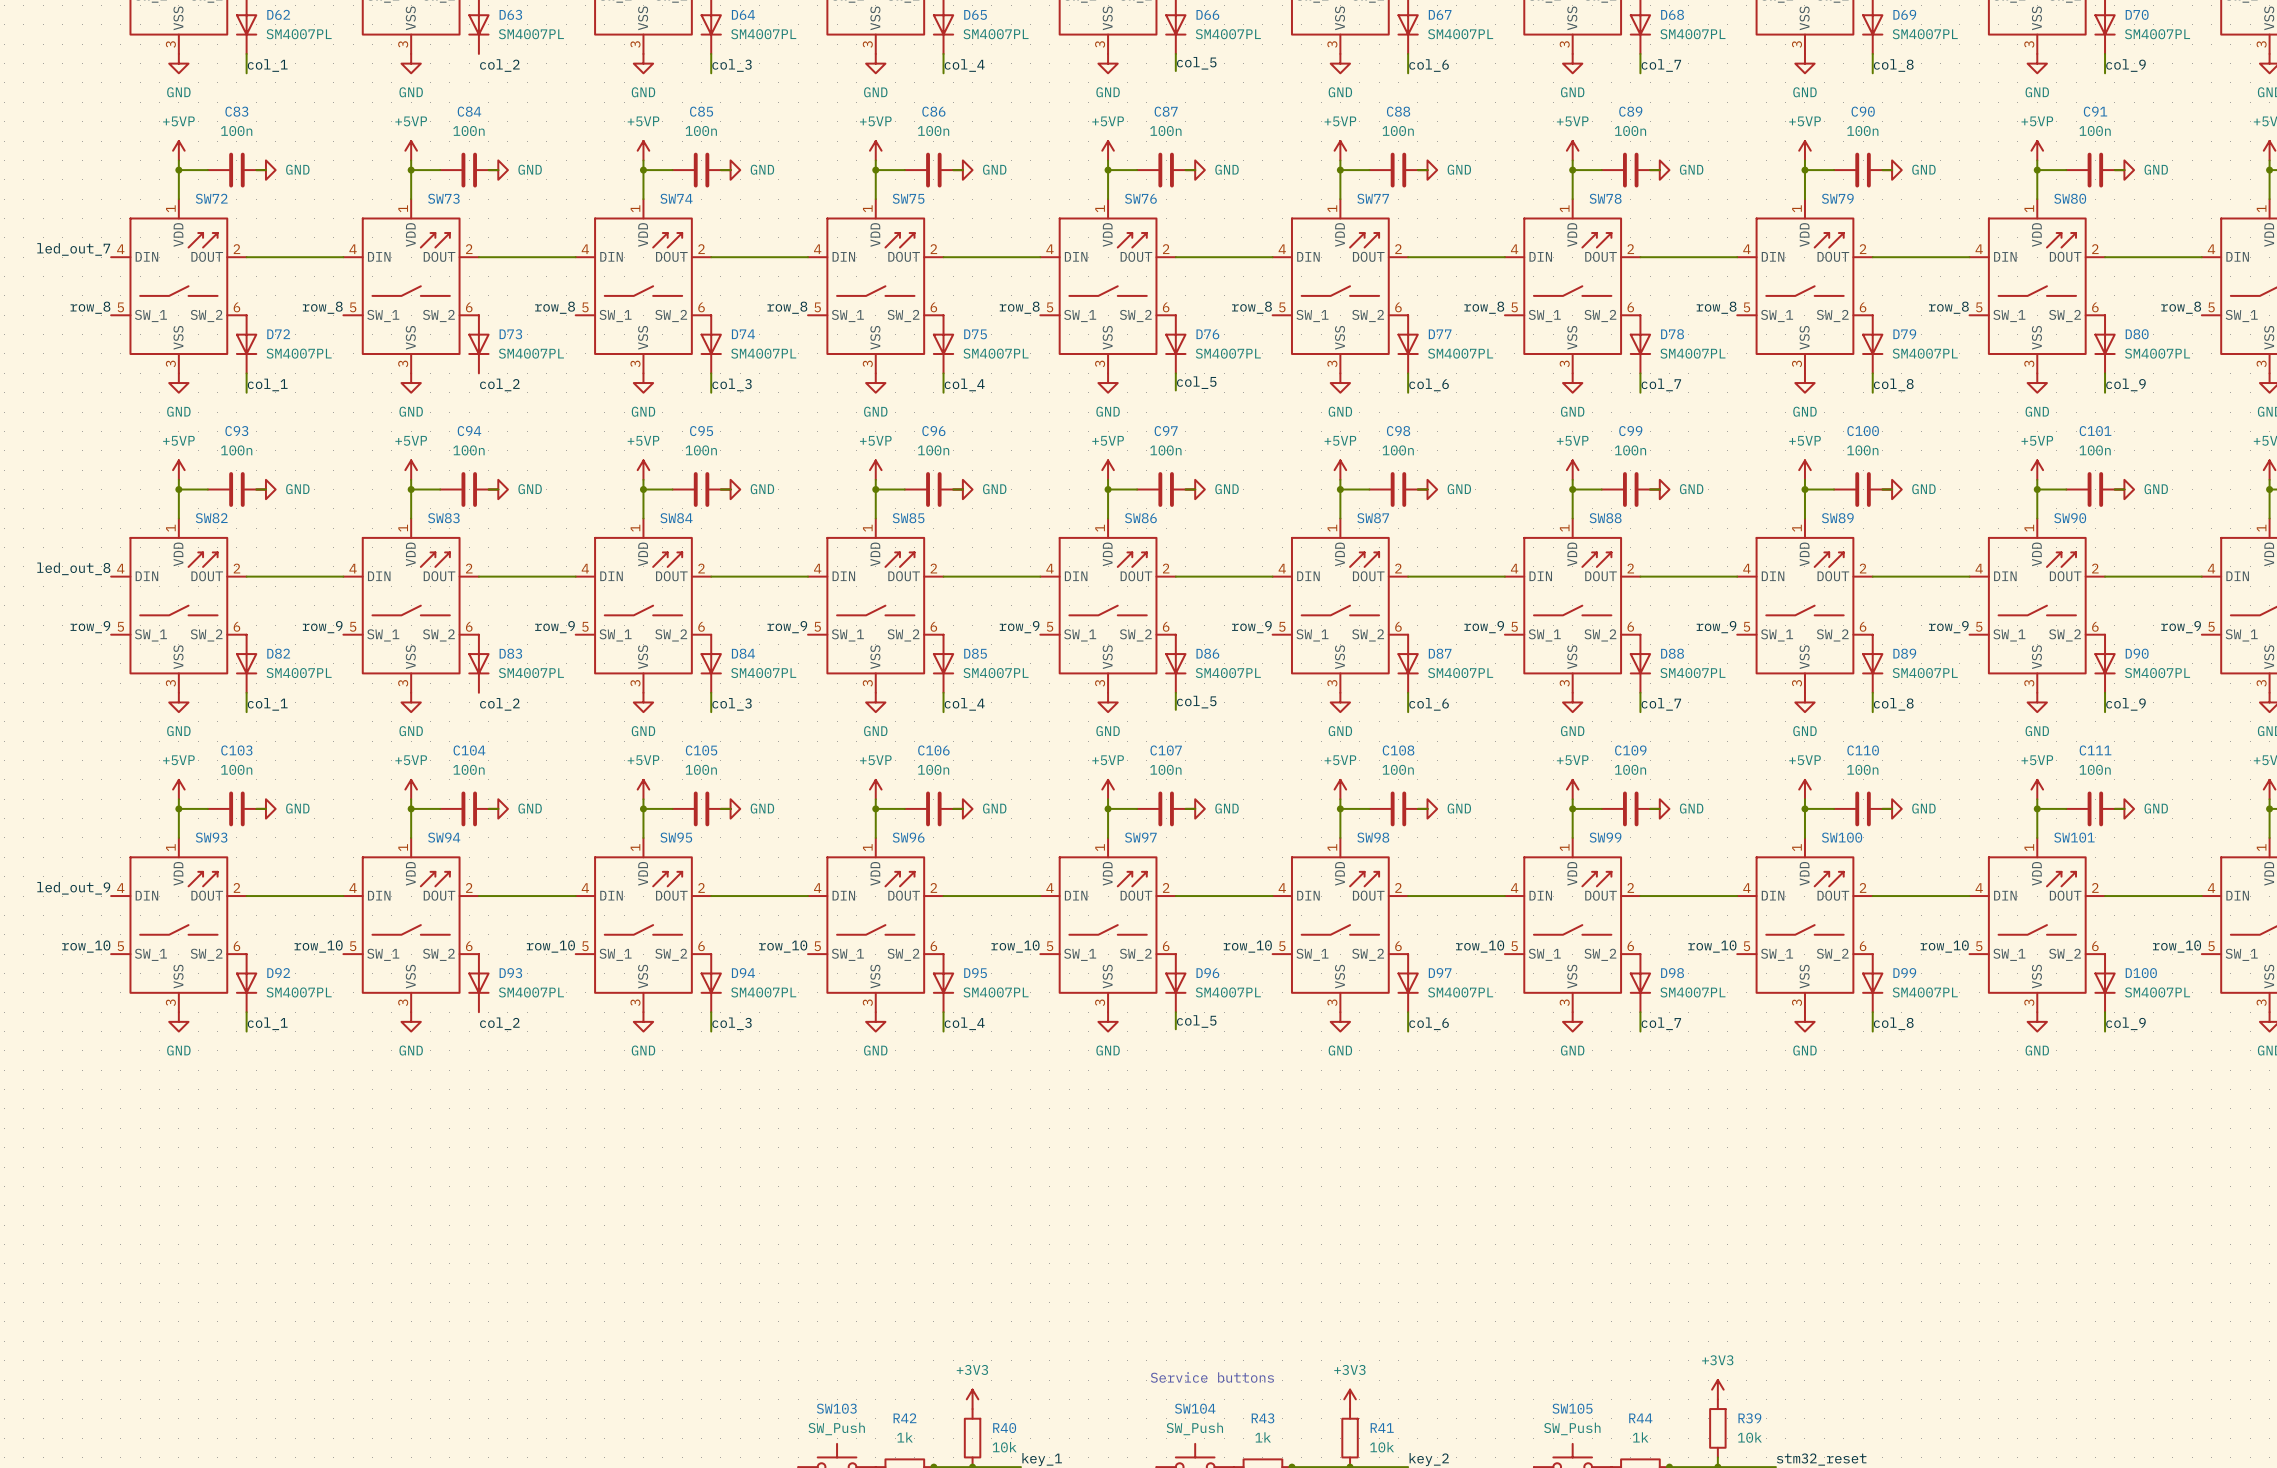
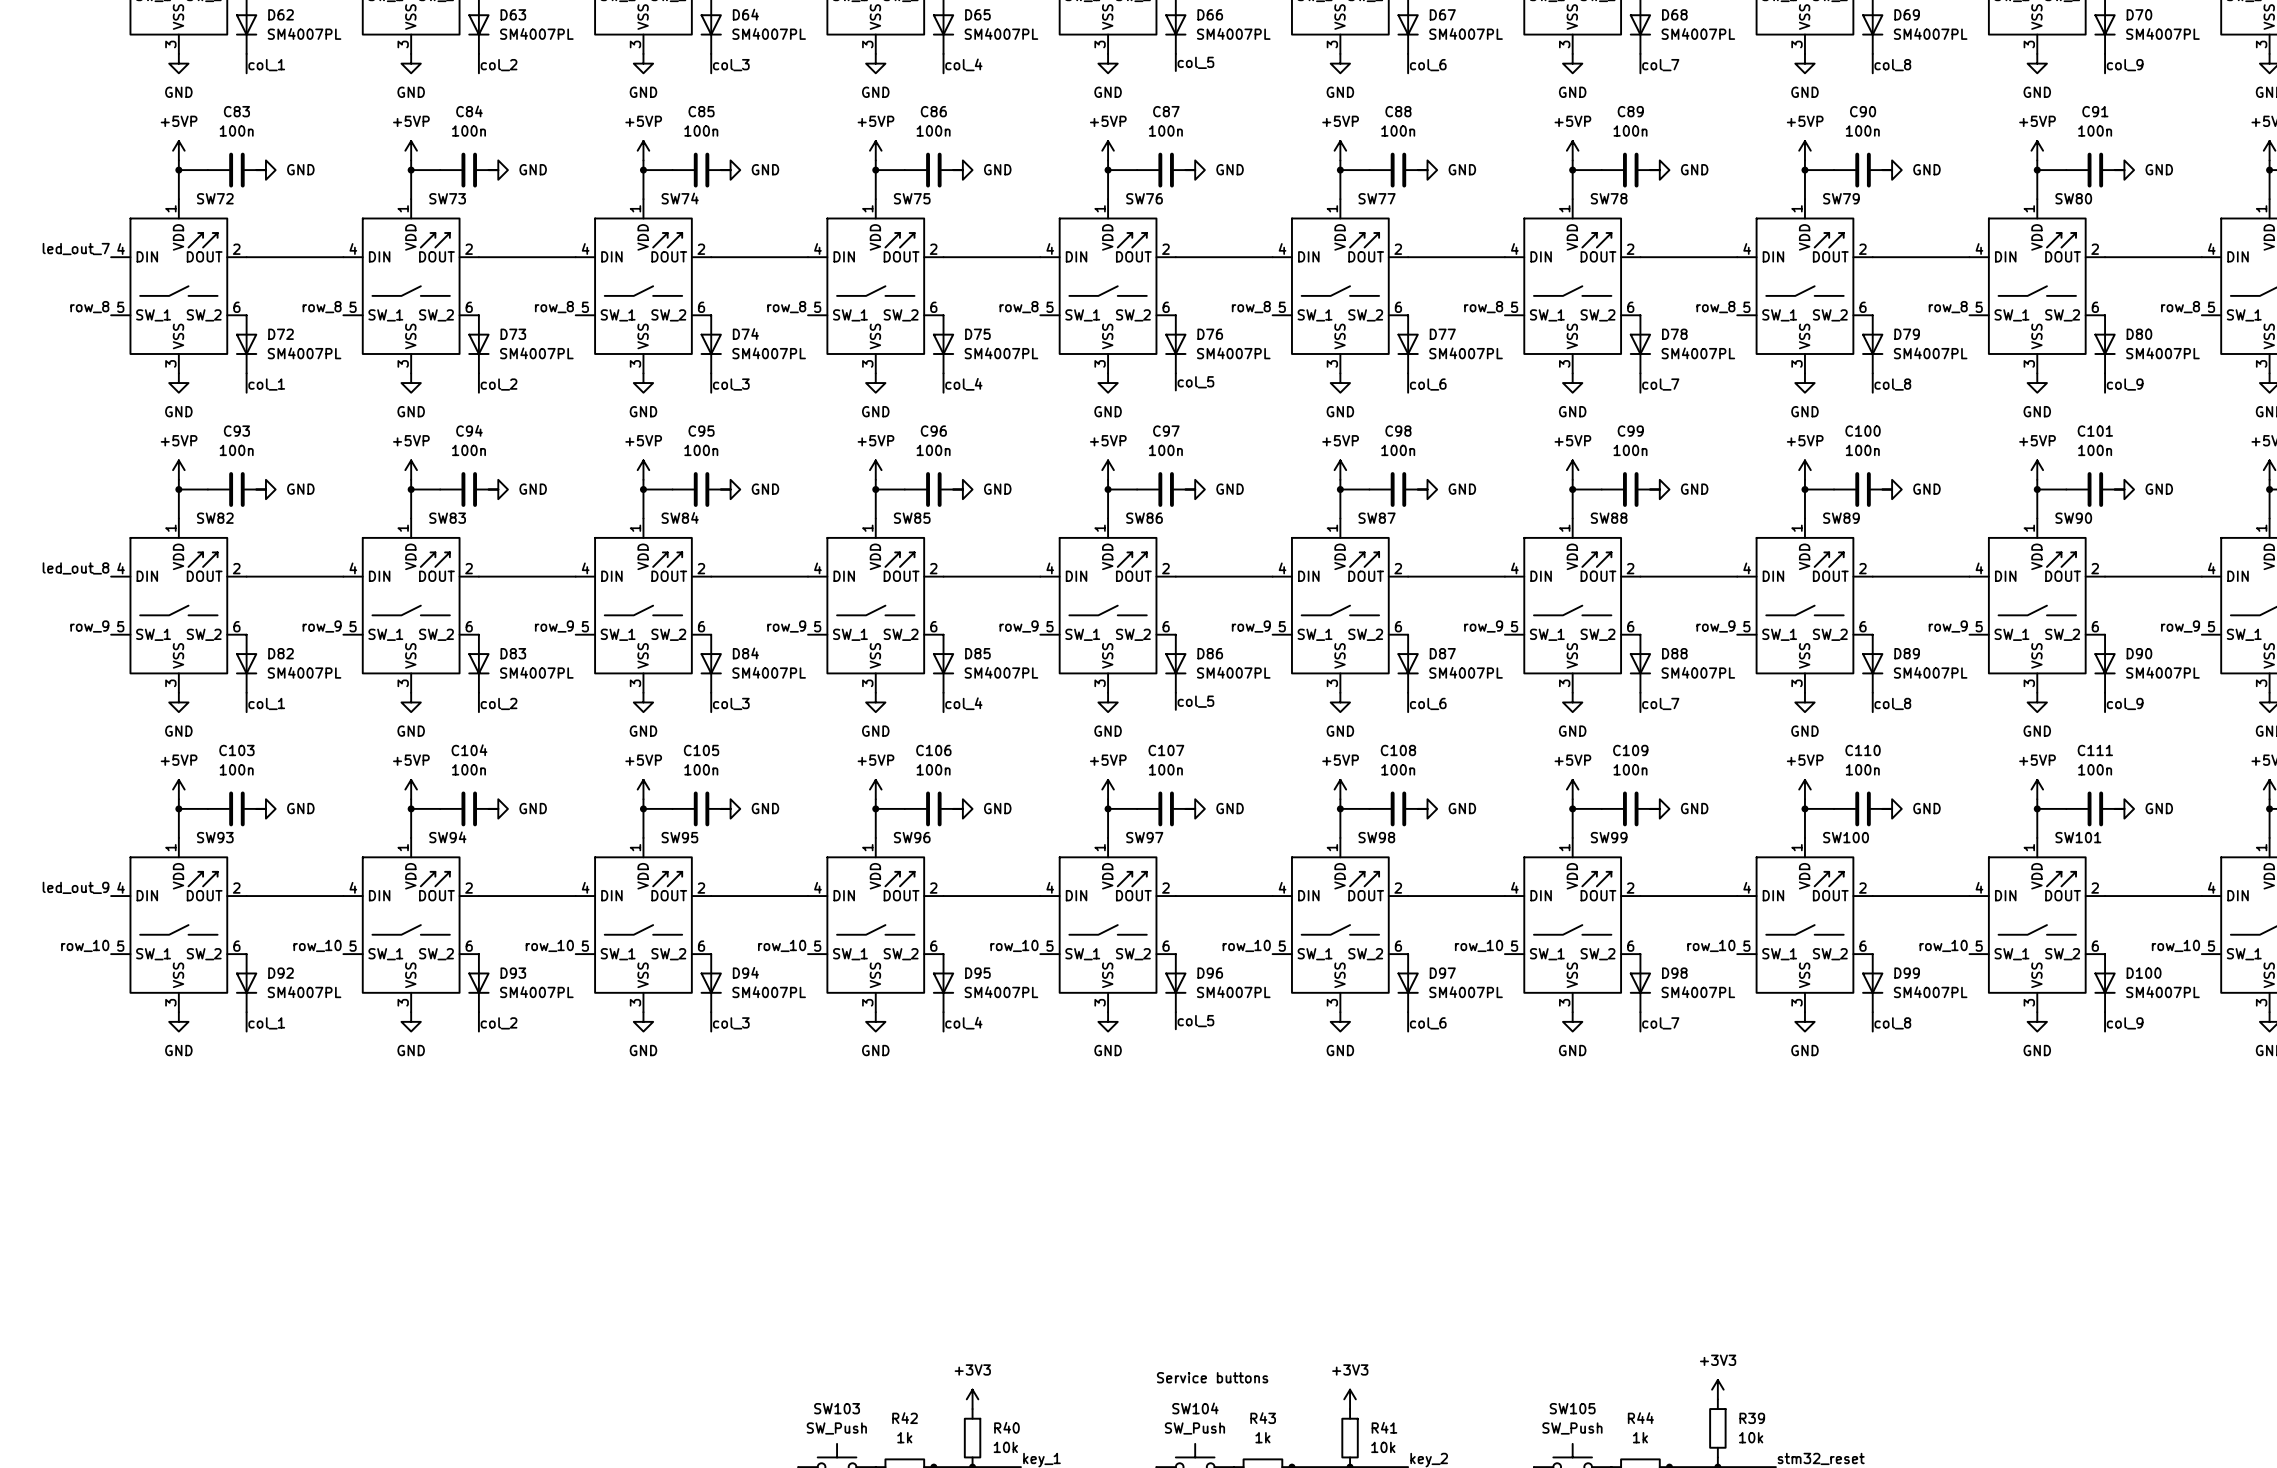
wire: none -> (478, 53) (478, 73)
wire: none -> (478, 373) (478, 392)
wire: none -> (478, 692) (478, 712)
wire: none -> (478, 1012) (478, 1031)

